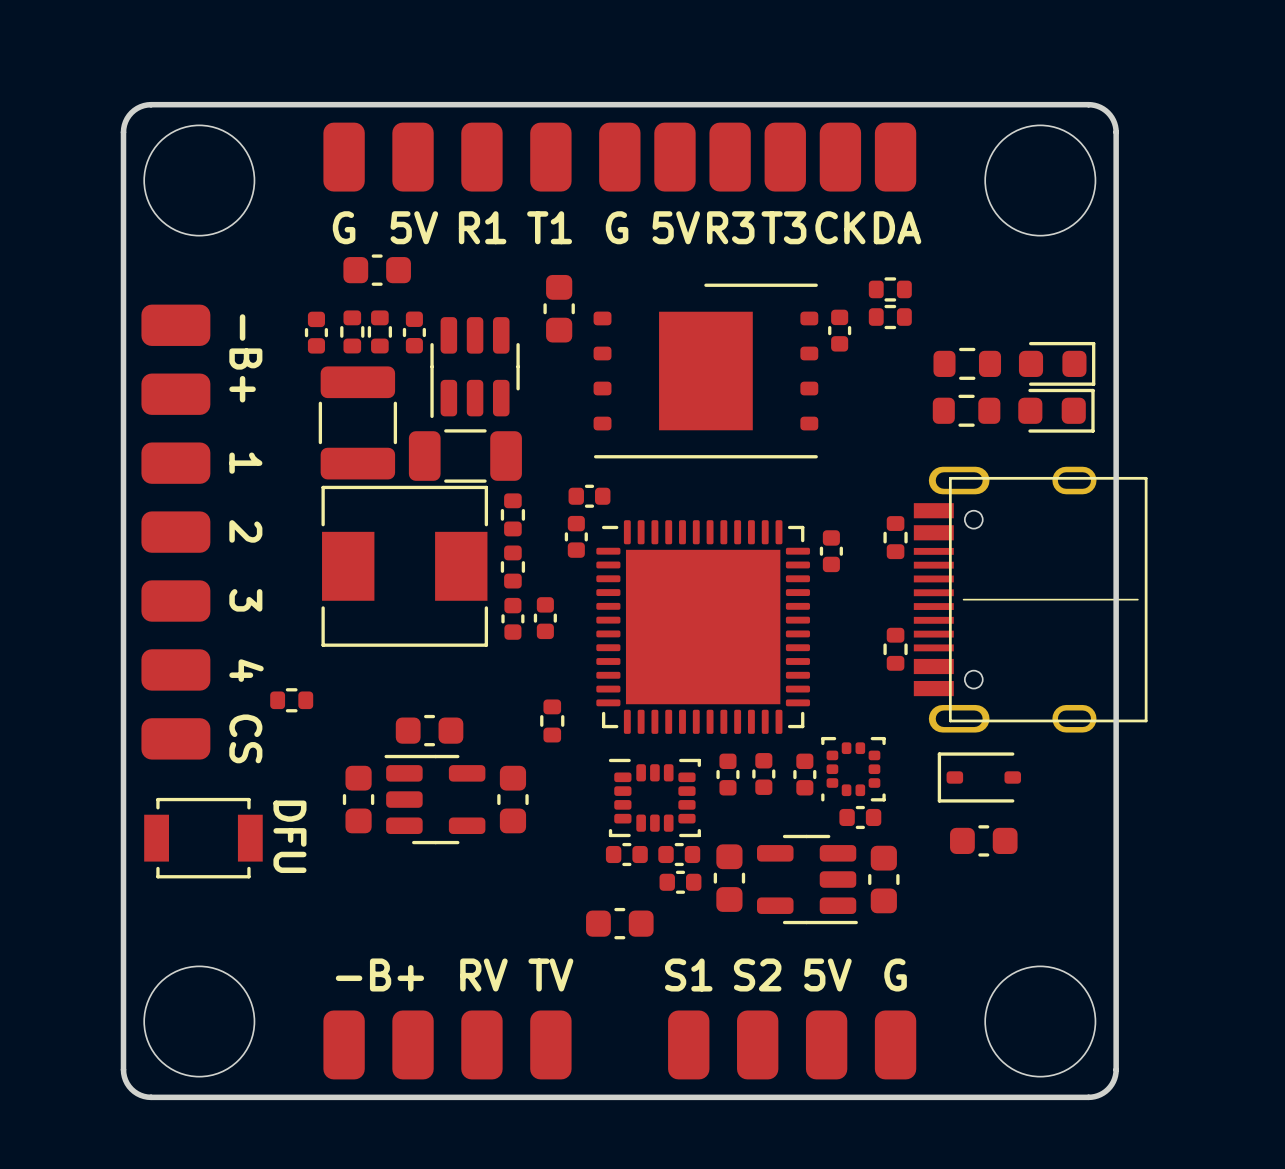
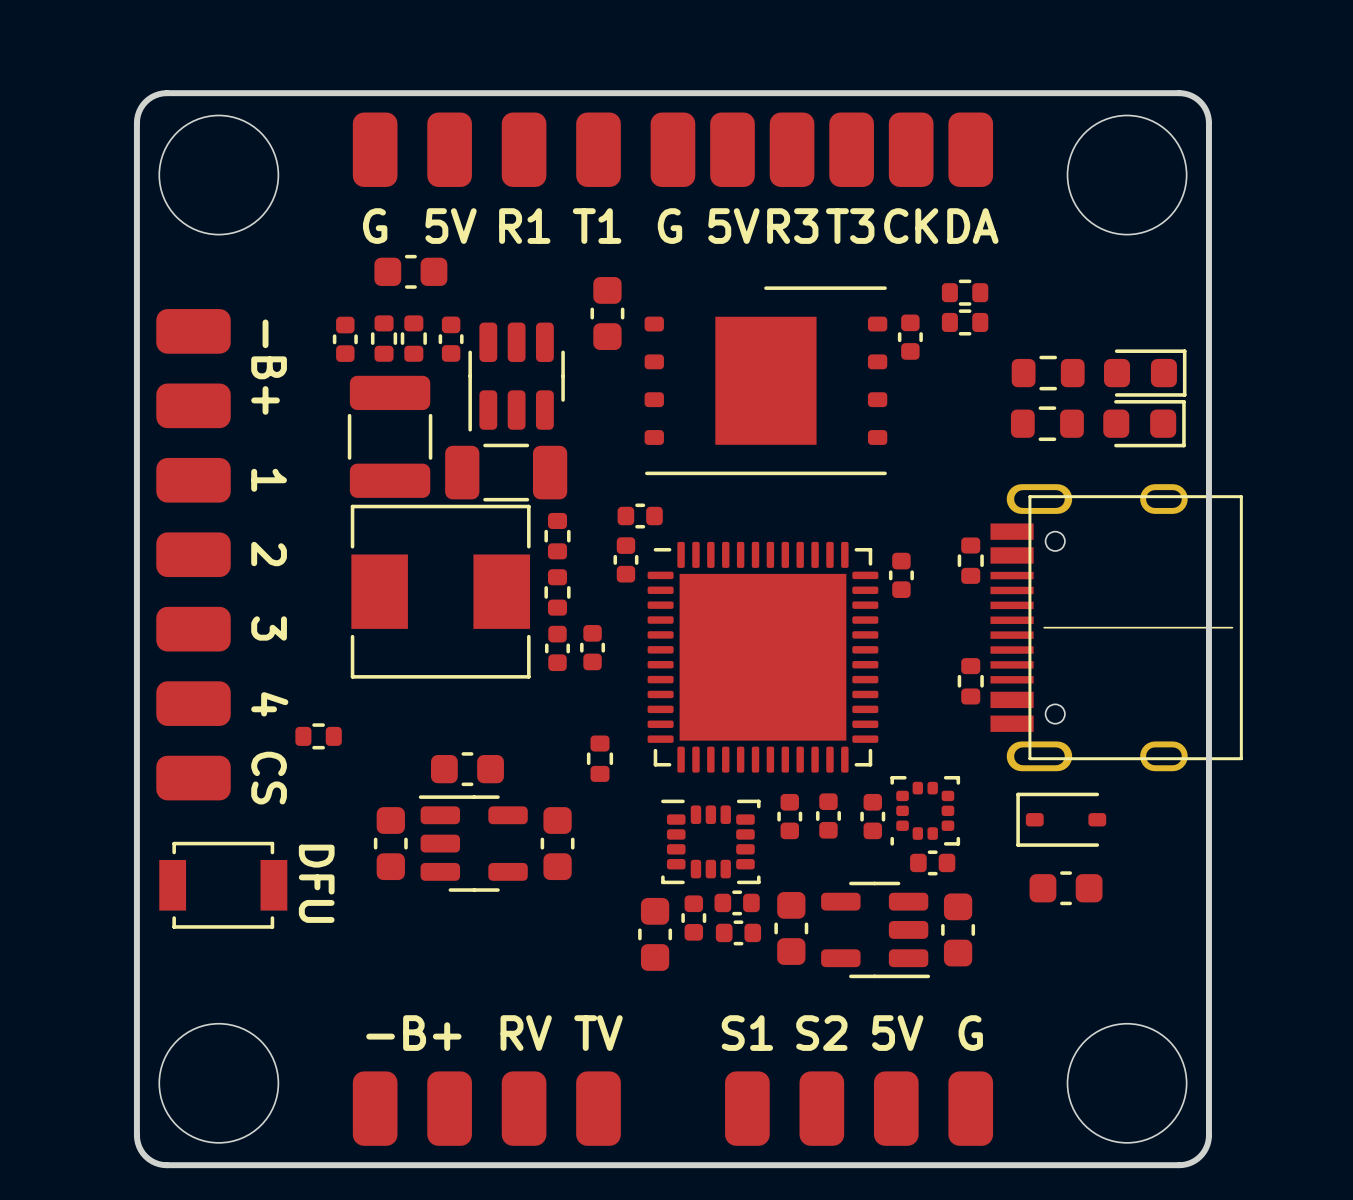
part rotation: 0° (626, 854) -> 90° clockwise (693, 918)
part rotation: 0° (619, 923) -> 90° clockwise (655, 934)
part position: (619, 923) -> (655, 934)

